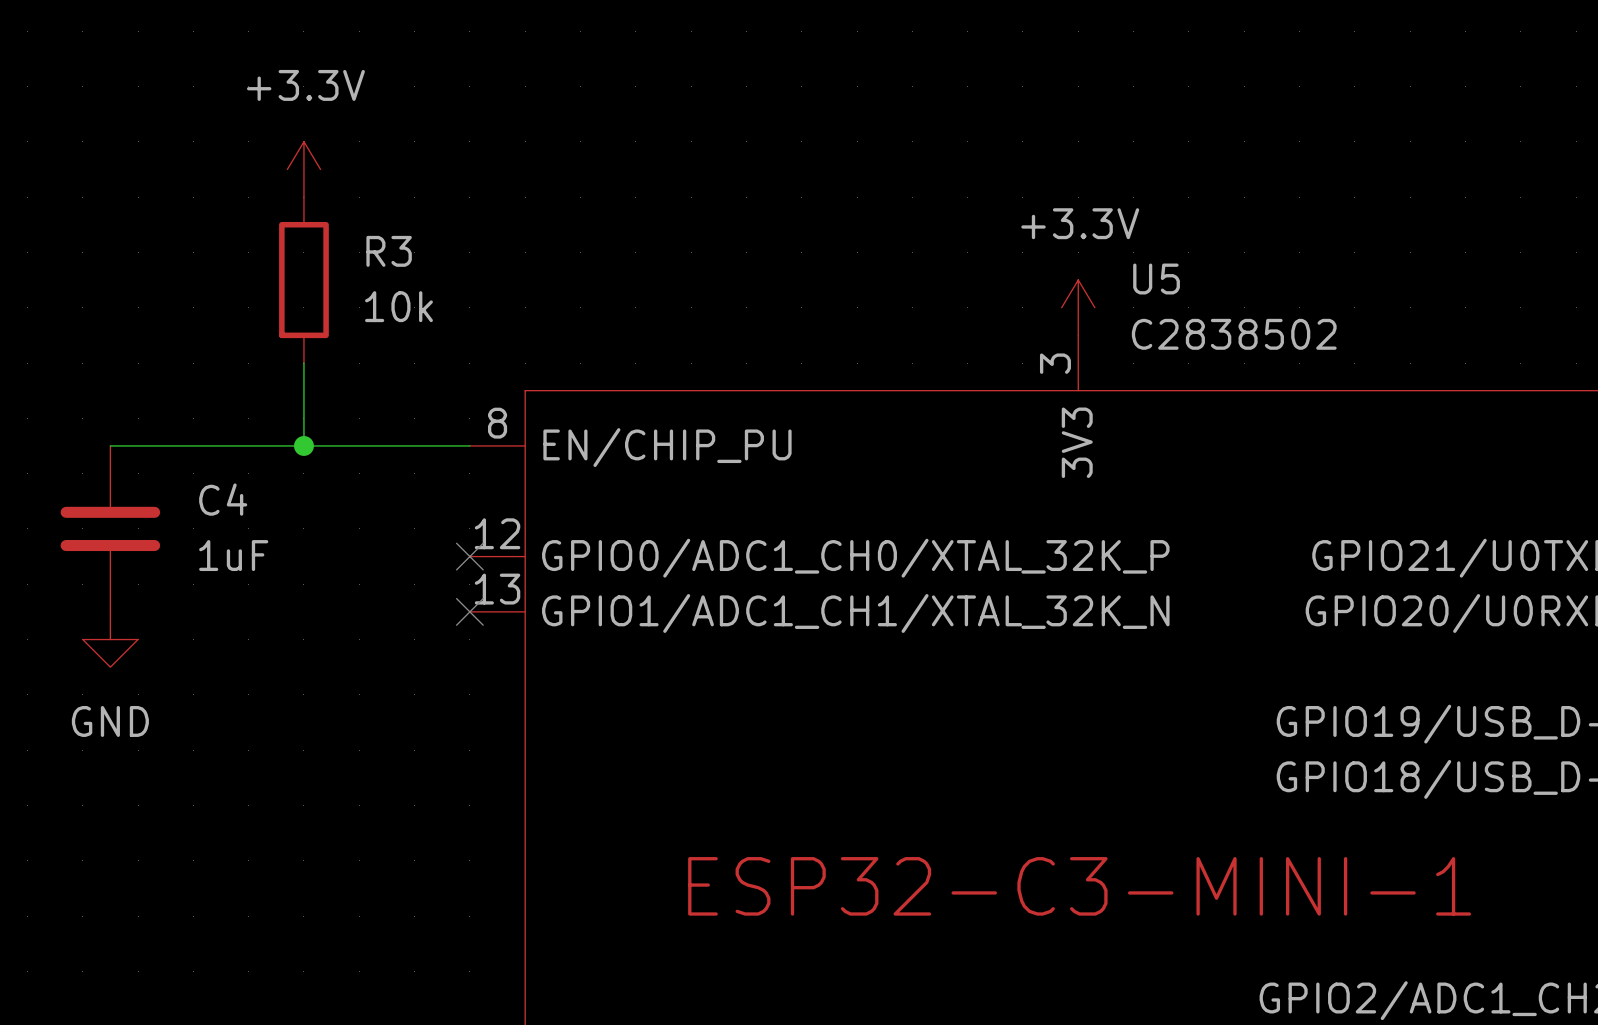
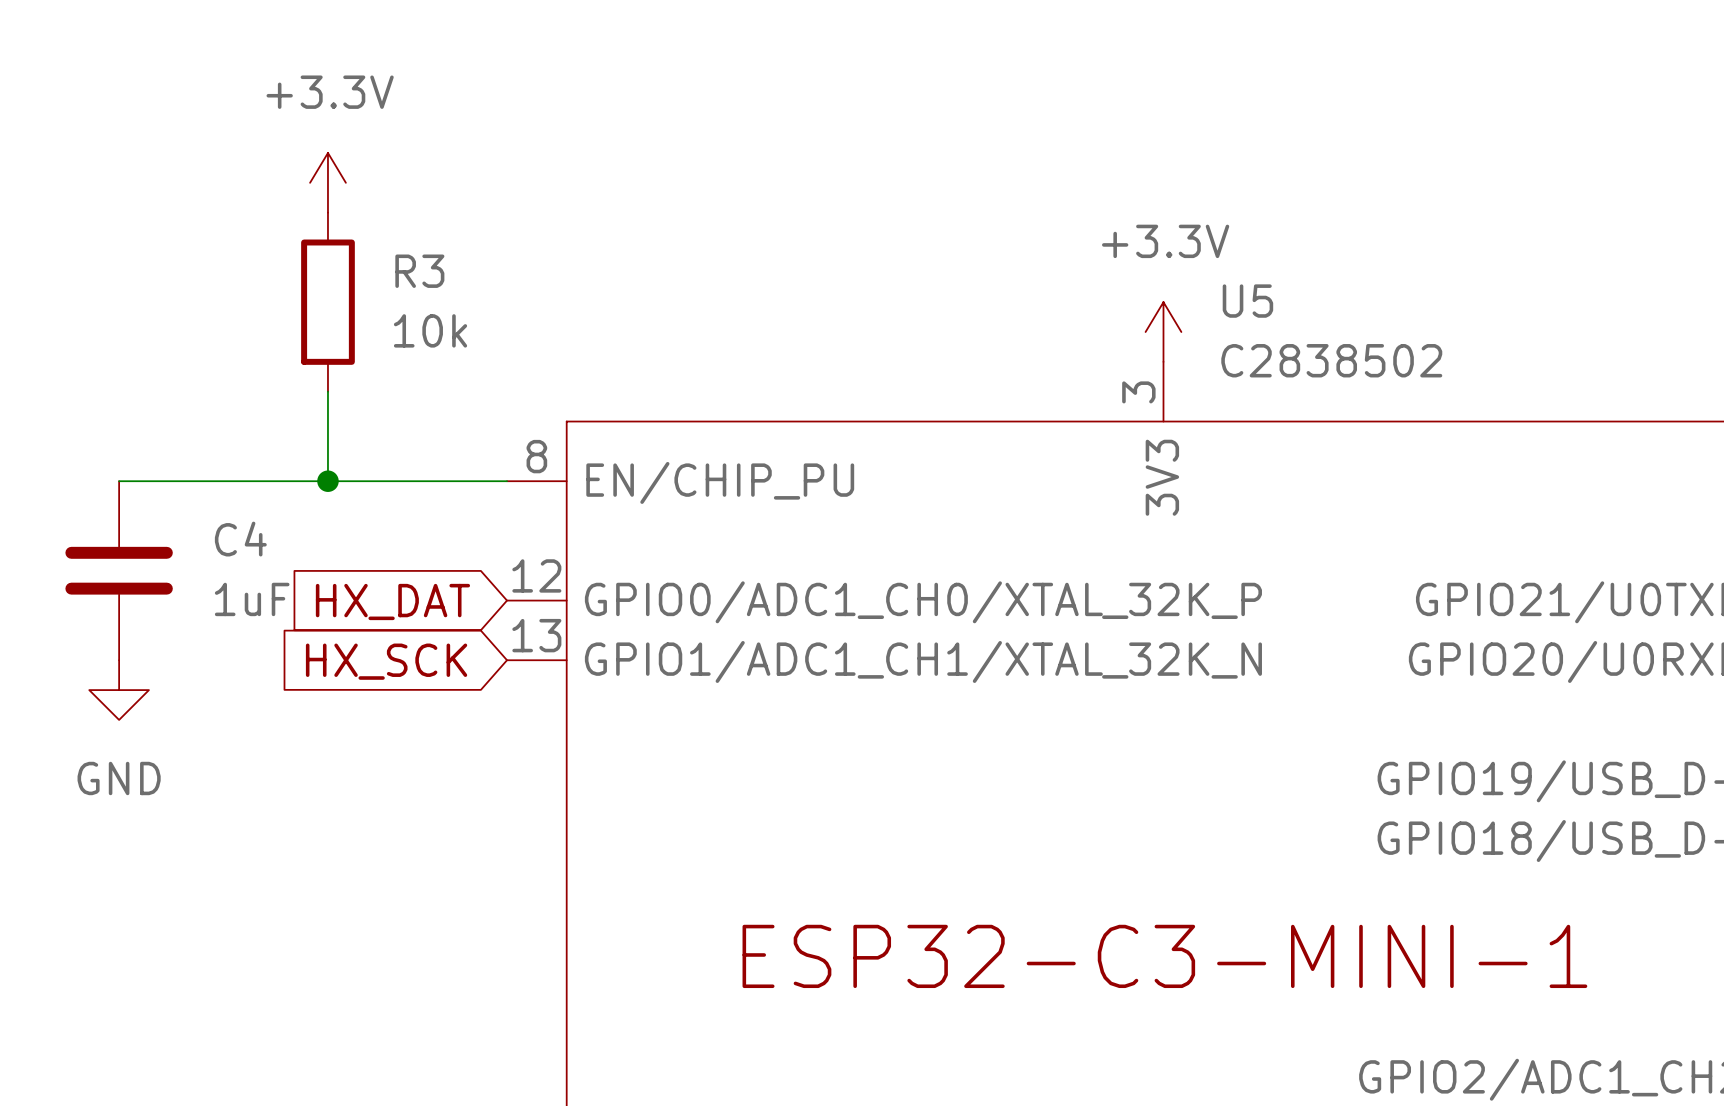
no-connect mark: (469, 556) -> none
global label: none -> HX_DAT (392, 601)
no-connect mark: (469, 611) -> none
global label: none -> HX_SCK (386, 661)

